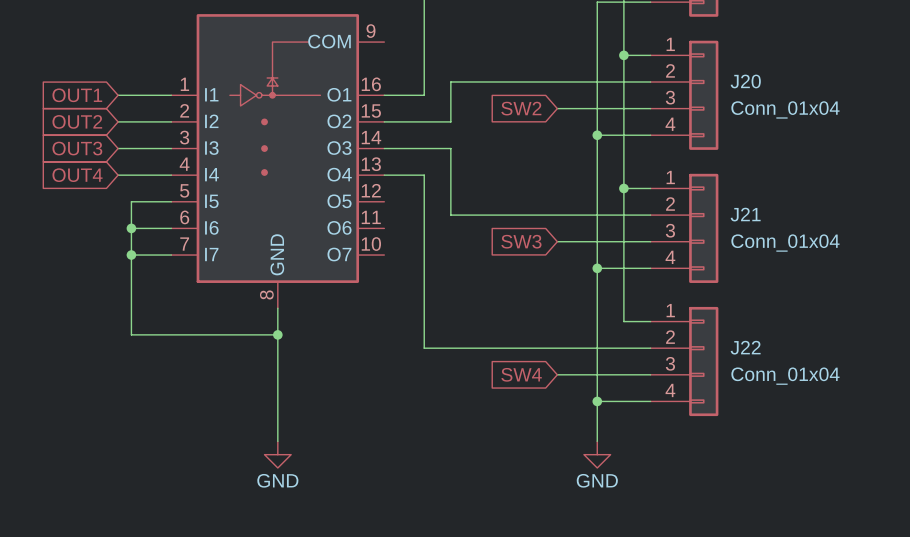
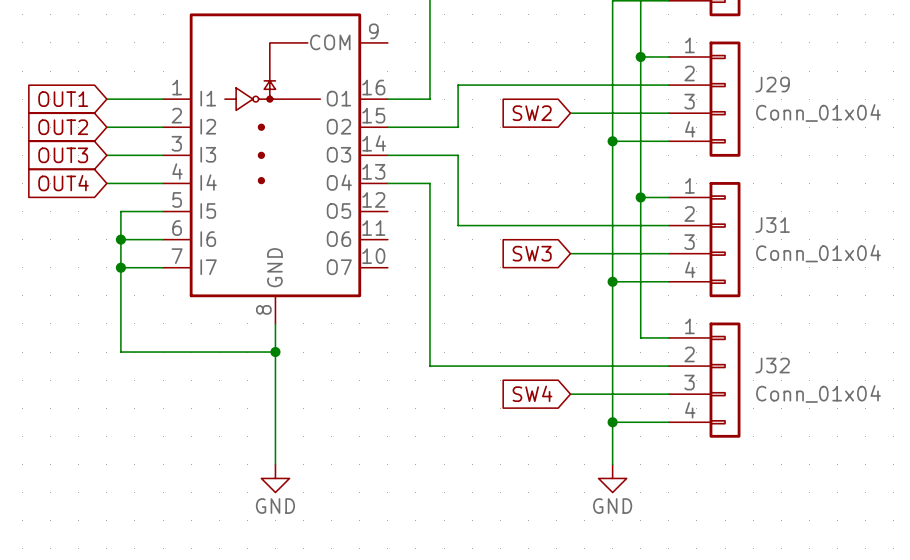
J20 name: J20 (745, 81) -> J29 (772, 84)
J21 name: J21 (745, 214) -> J31 (772, 225)
J22 name: J22 (745, 347) -> J32 (772, 365)

